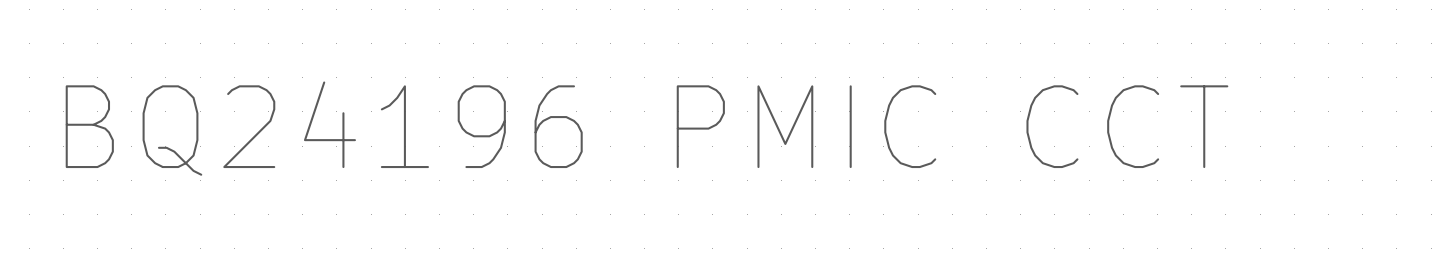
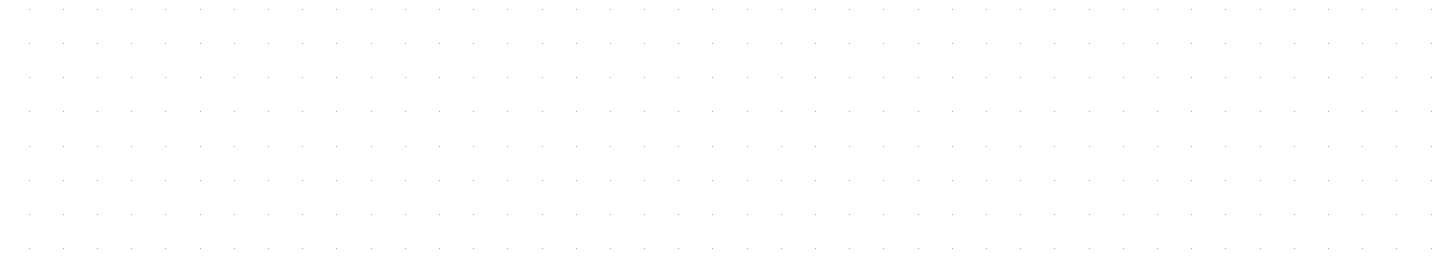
text: BQ24196 PMIC CCT (647, 128) -> none

